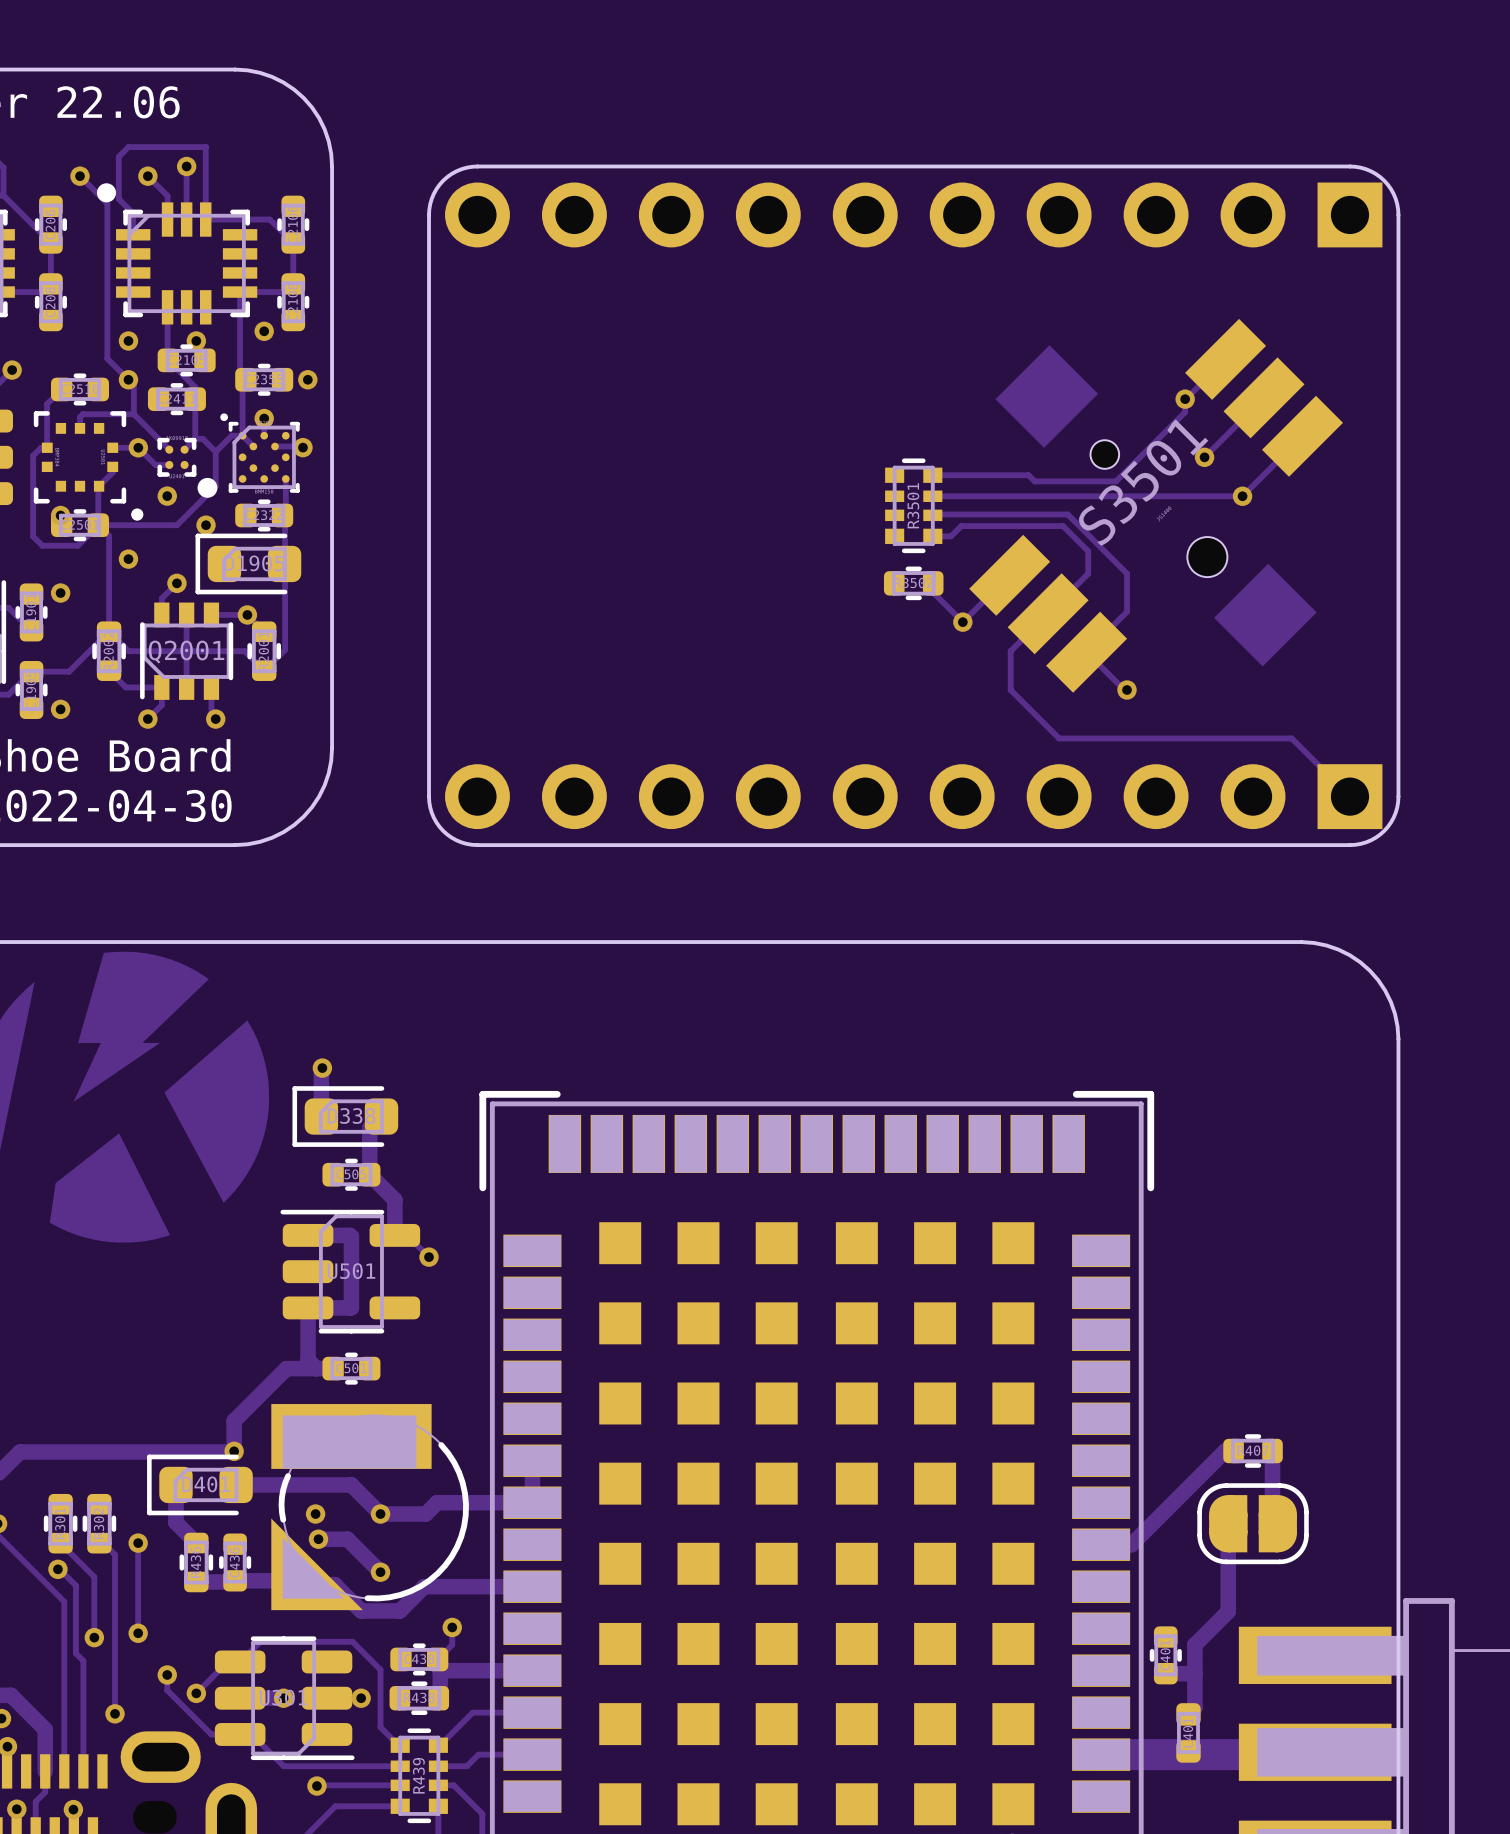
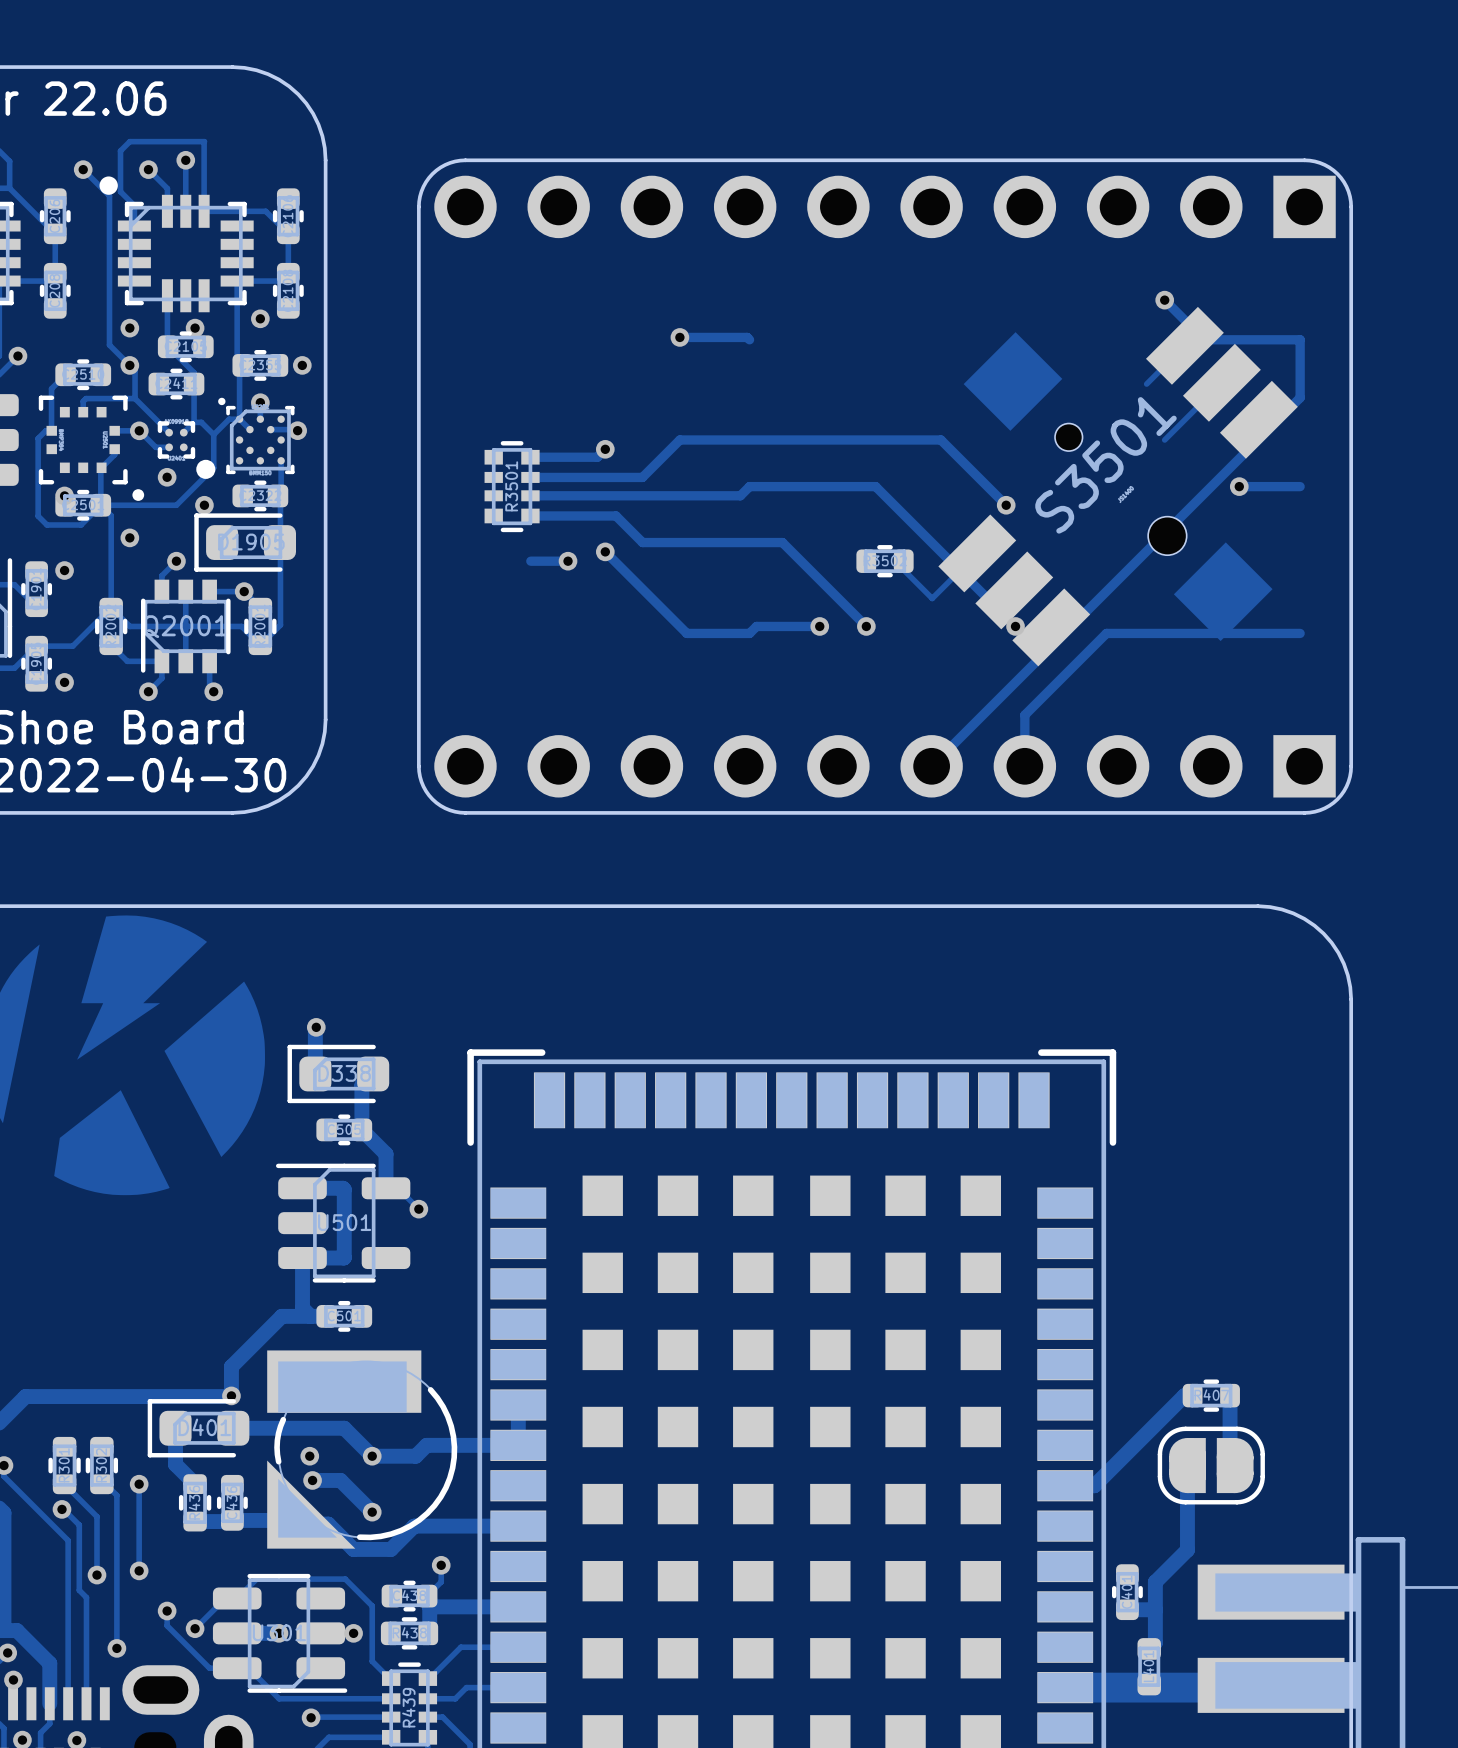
track: none -> (1164, 300) (1204, 339) (1300, 339) (1300, 397) (931, 766)
via: none -> (1164, 300)
track: none -> (679, 337) (747, 337) (749, 339)
via: none -> (679, 337)
track: (1185, 399) (1185, 412) (1115, 481) (1034, 481) (1028, 475) (932, 475) -> none
via: (1185, 399) -> none
track: (1302, 436) (1242, 496) (932, 496) -> none
via: (1204, 457) -> none
track: none -> (605, 449) (597, 457) (530, 457) (531, 458)
via: none -> (605, 449)
track: none -> (530, 477) (642, 477) (679, 439) (940, 439) (1006, 505)
via position: (1242, 496) -> (1239, 486)
R3501 position: (913, 505) -> (512, 486)
track: none -> (1239, 486) (1300, 486)
track: none -> (530, 495) (740, 495) (749, 486) (875, 486) (1015, 626)
track: (932, 515) (1067, 514) (1127, 573) (1127, 611) (1086, 652) (1124, 689) (1127, 689) -> none
via: none -> (1006, 505)
track: none -> (530, 515) (616, 515) (642, 542) (782, 542) (866, 626)
track: (932, 536) (951, 536) (961, 526) (1063, 526) (1088, 551) (1088, 573) (1010, 651) (1010, 689) (1059, 738) (1291, 738) (1349, 796) -> none
track: none -> (605, 551) (686, 633) (749, 633) (756, 626) (819, 626)
via: none -> (605, 551)
track: none -> (530, 561) (568, 561)
via: none -> (568, 561)
via: (962, 622) -> none
via: none -> (819, 626)
via: none -> (866, 626)
via: none -> (1015, 626)
track: none -> (1300, 633) (1106, 633) (1024, 715) (1024, 766)
via: (1127, 689) -> none

